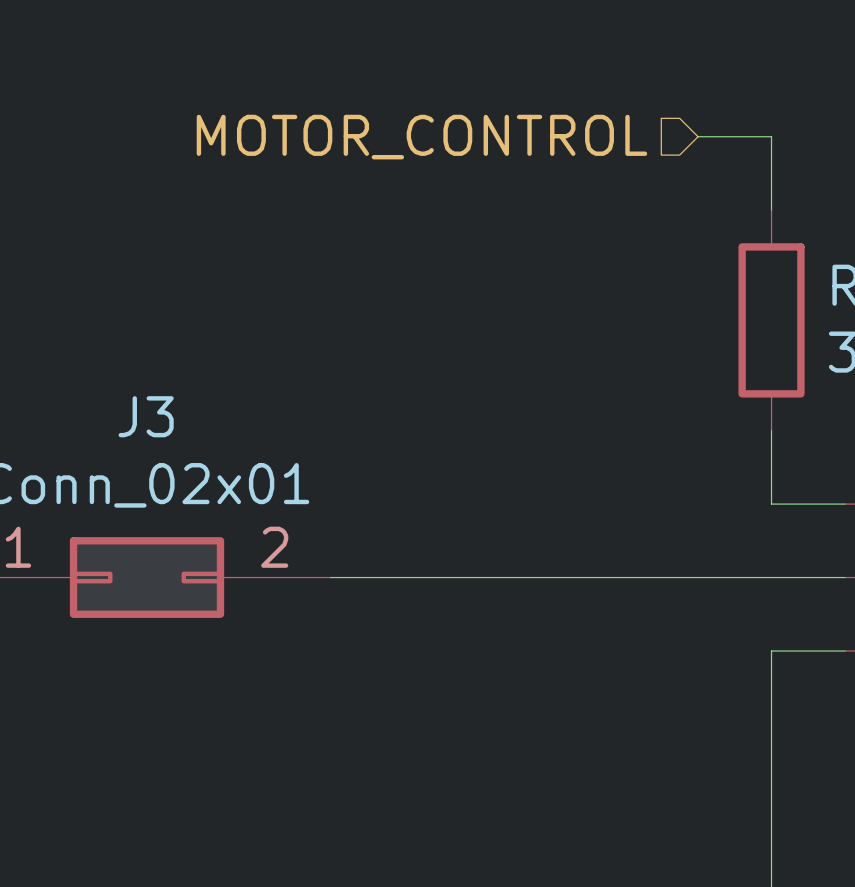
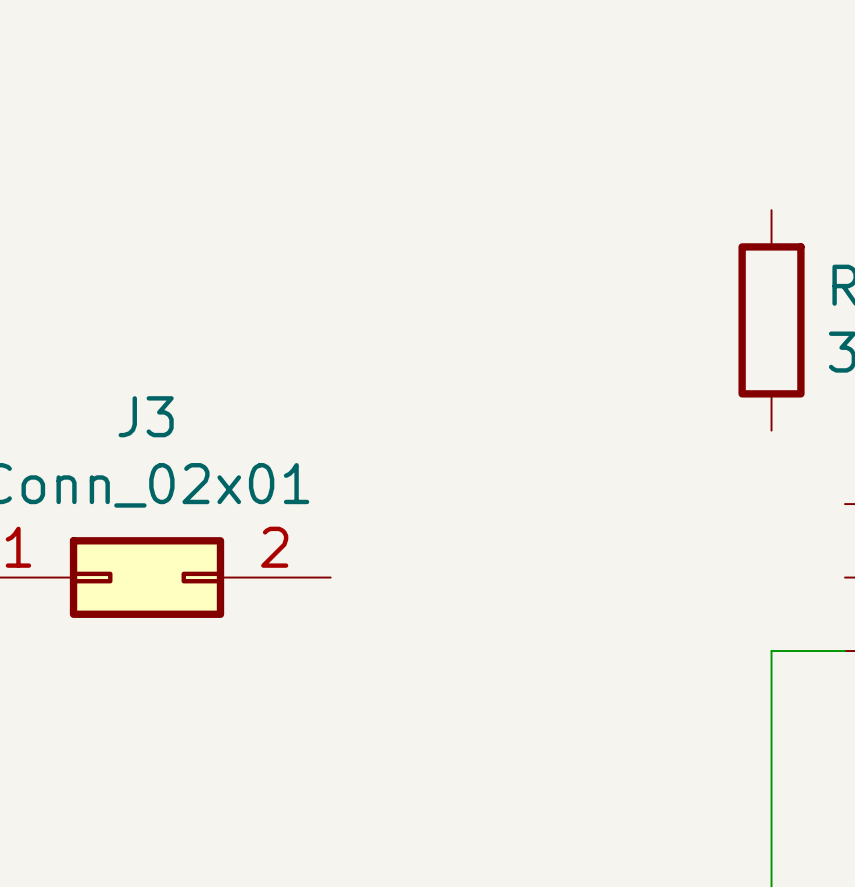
wire: (698, 136) (771, 136) (771, 210) -> none
hierarchical label: MOTOR_CONTROL (421, 137) -> none
wire: (771, 430) (771, 504) (844, 504) -> none
wire: (330, 577) (844, 577) -> none

